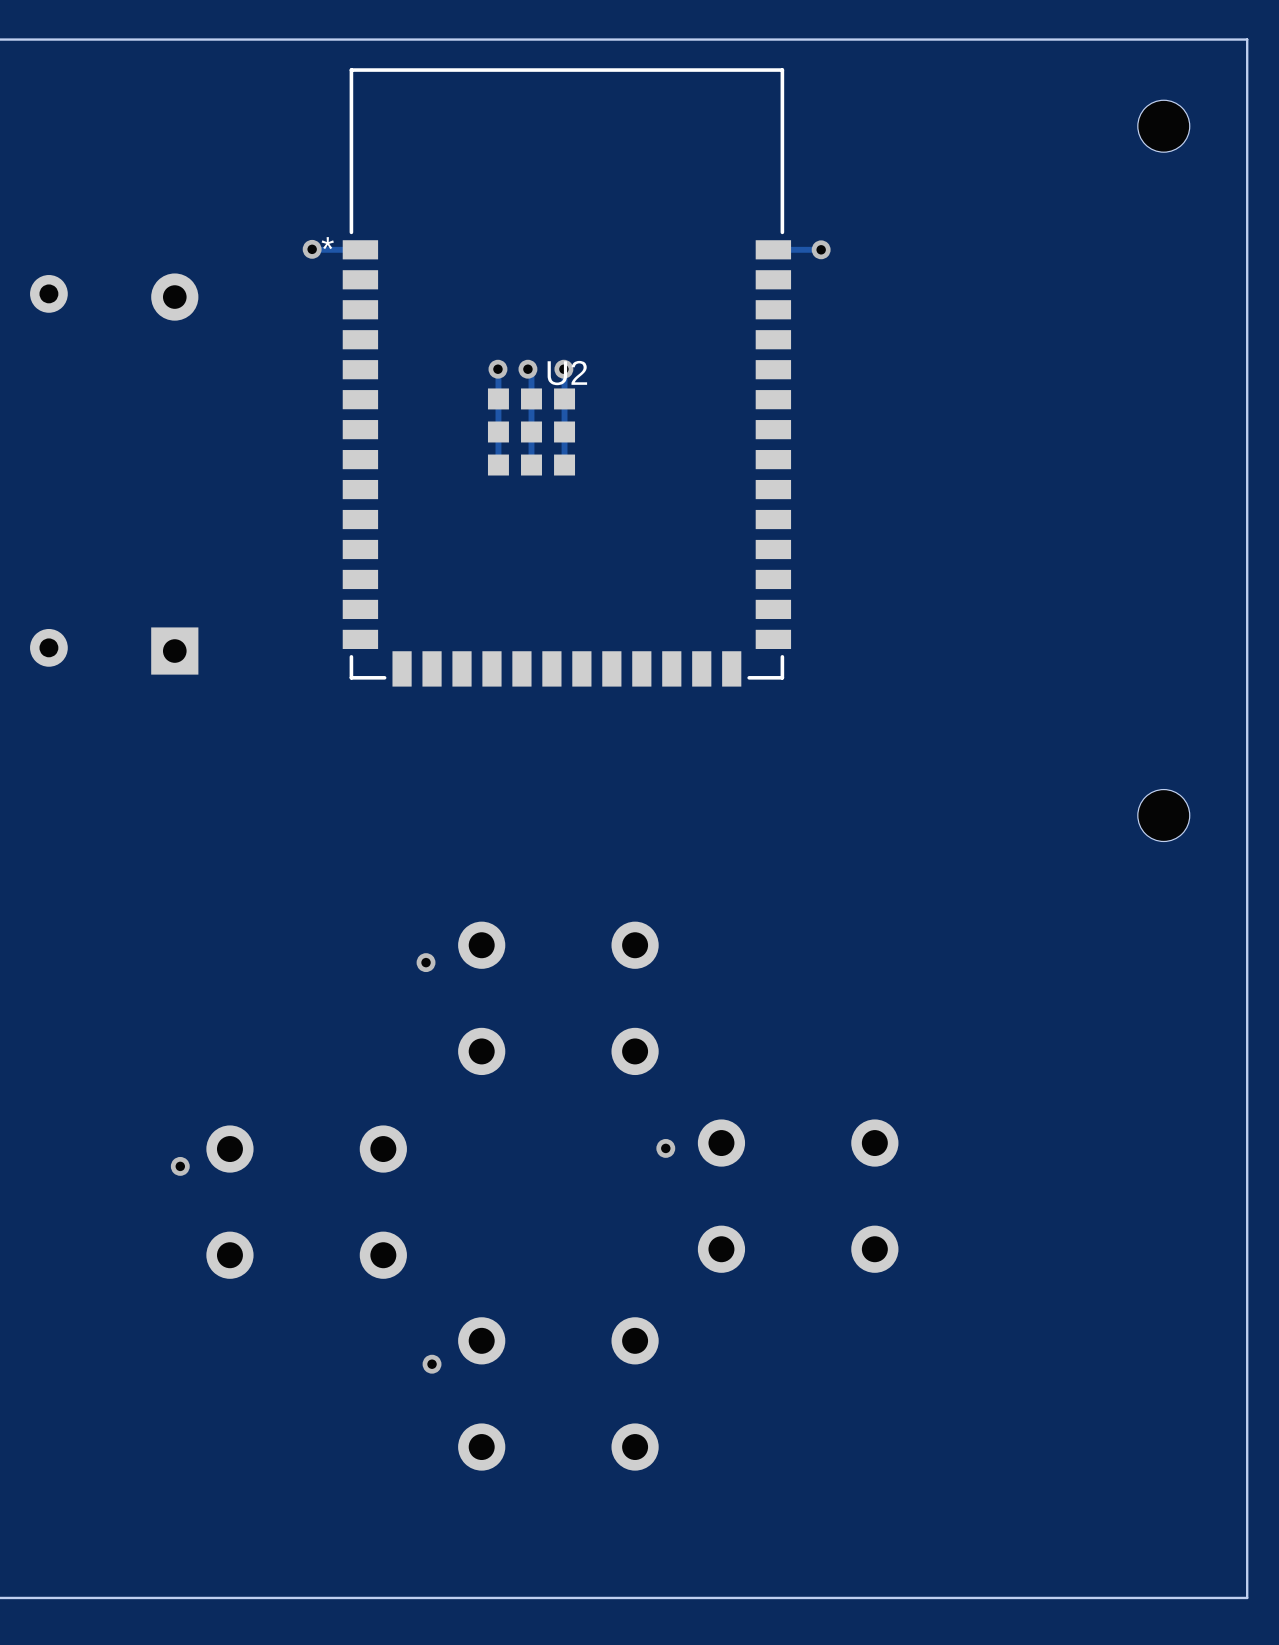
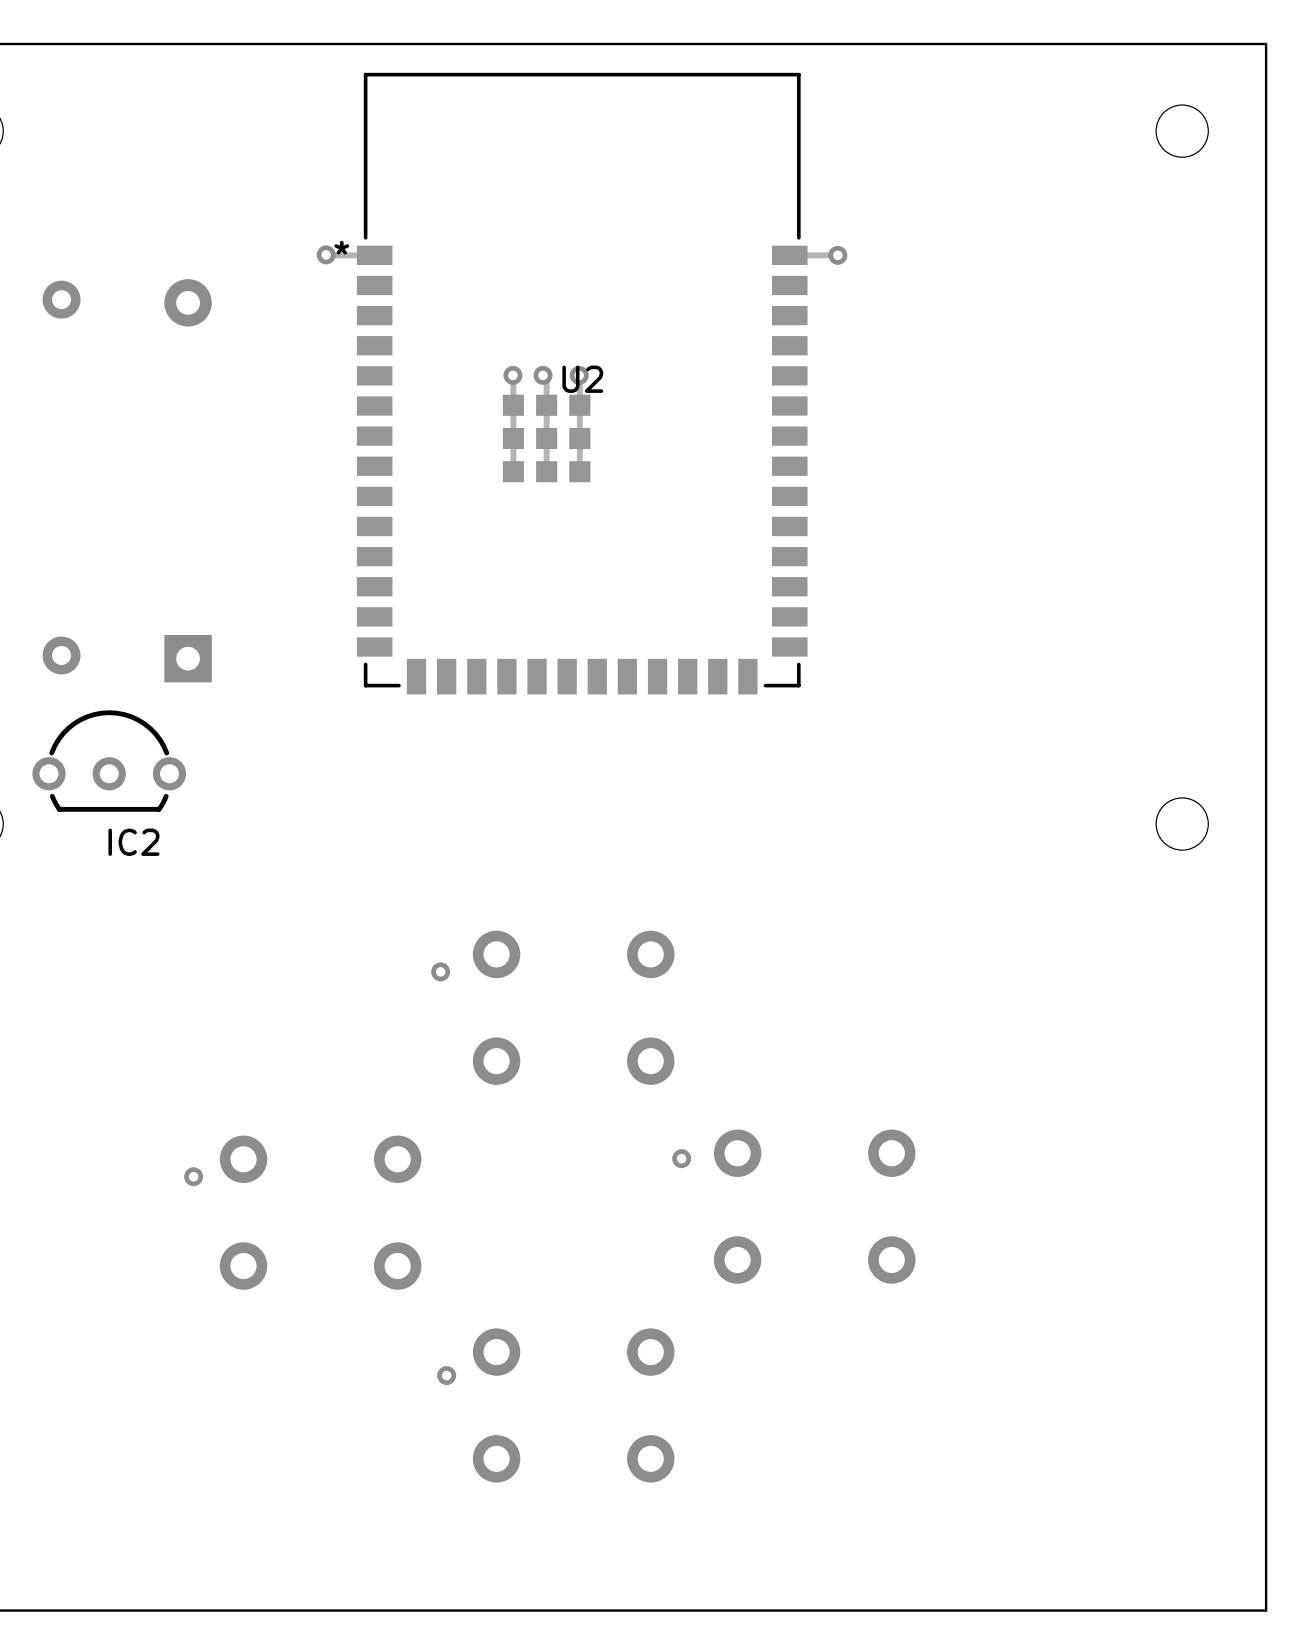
IC2: none -> (109, 761)

